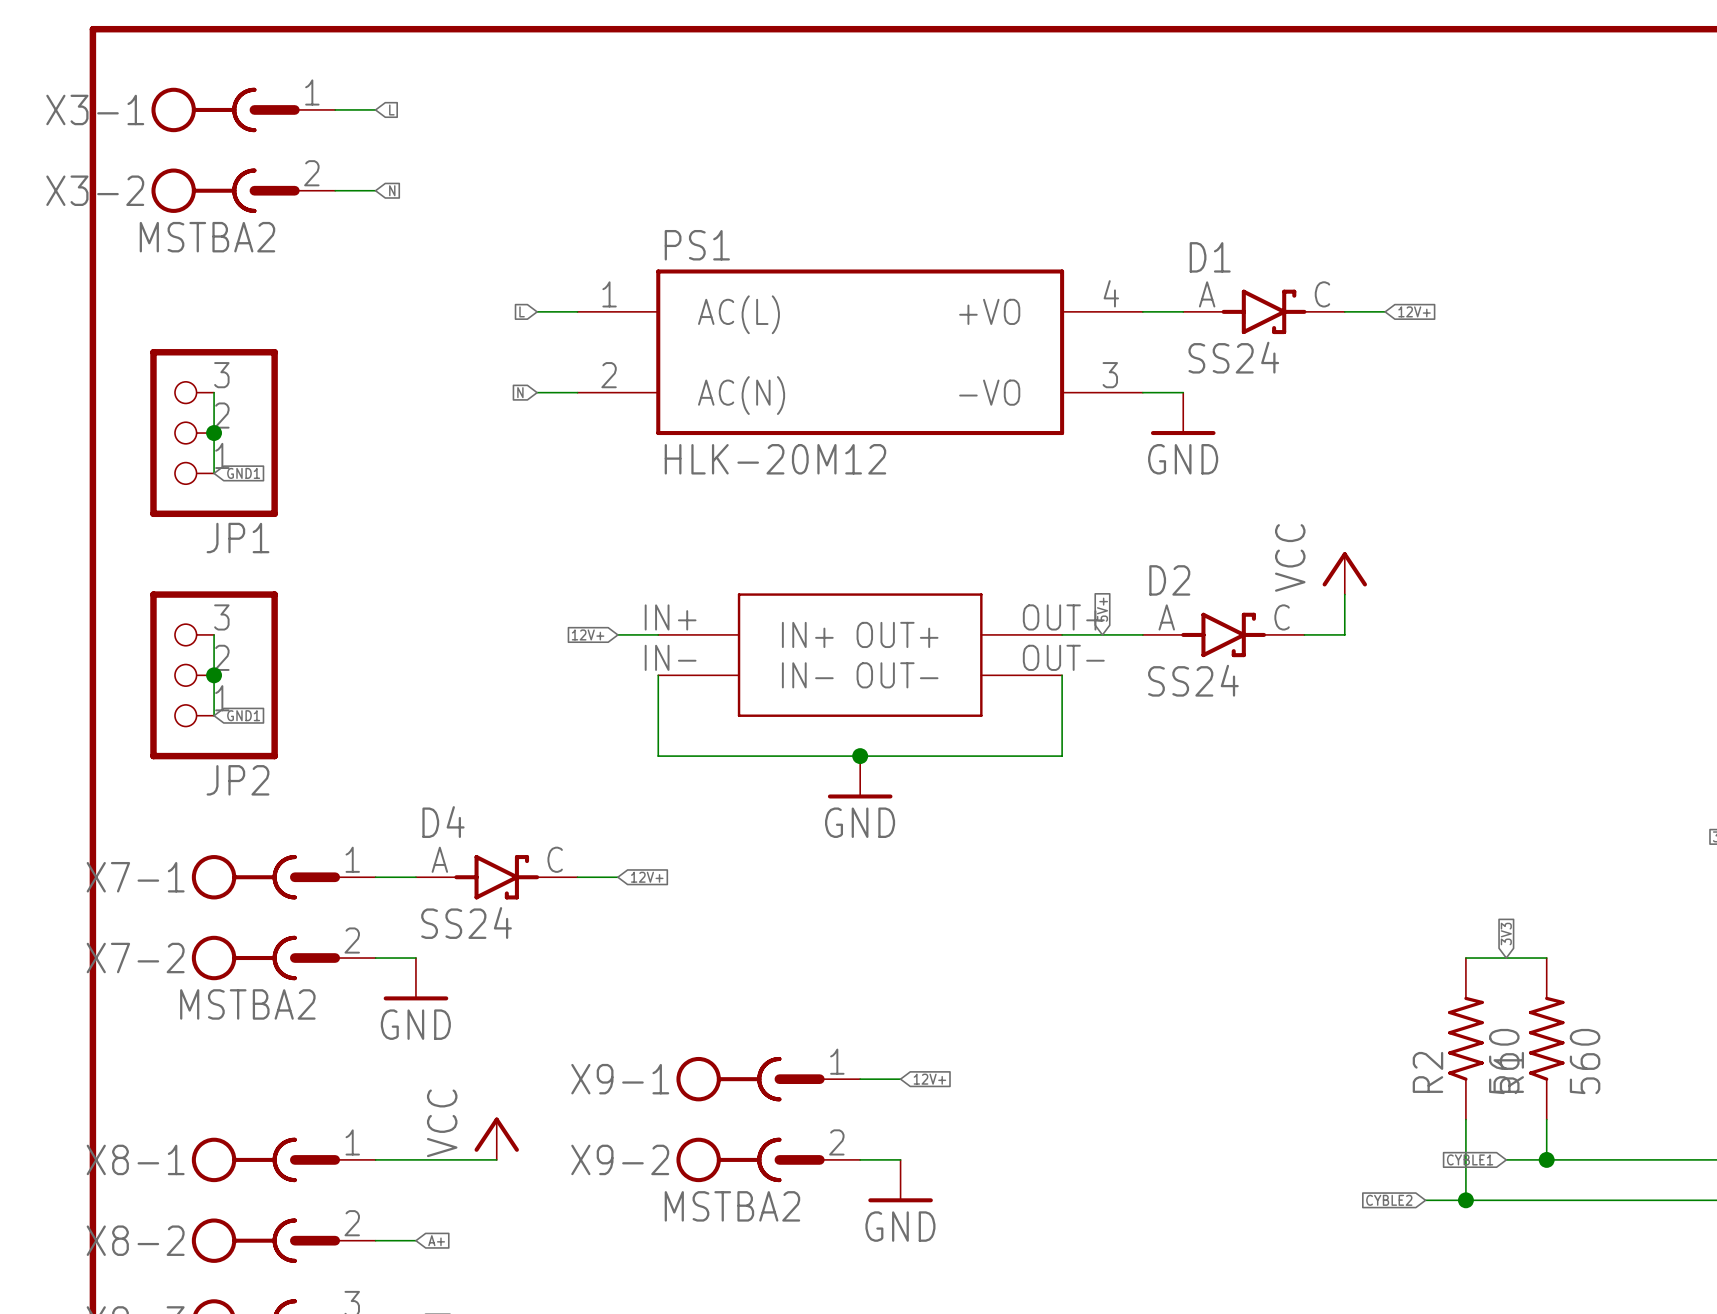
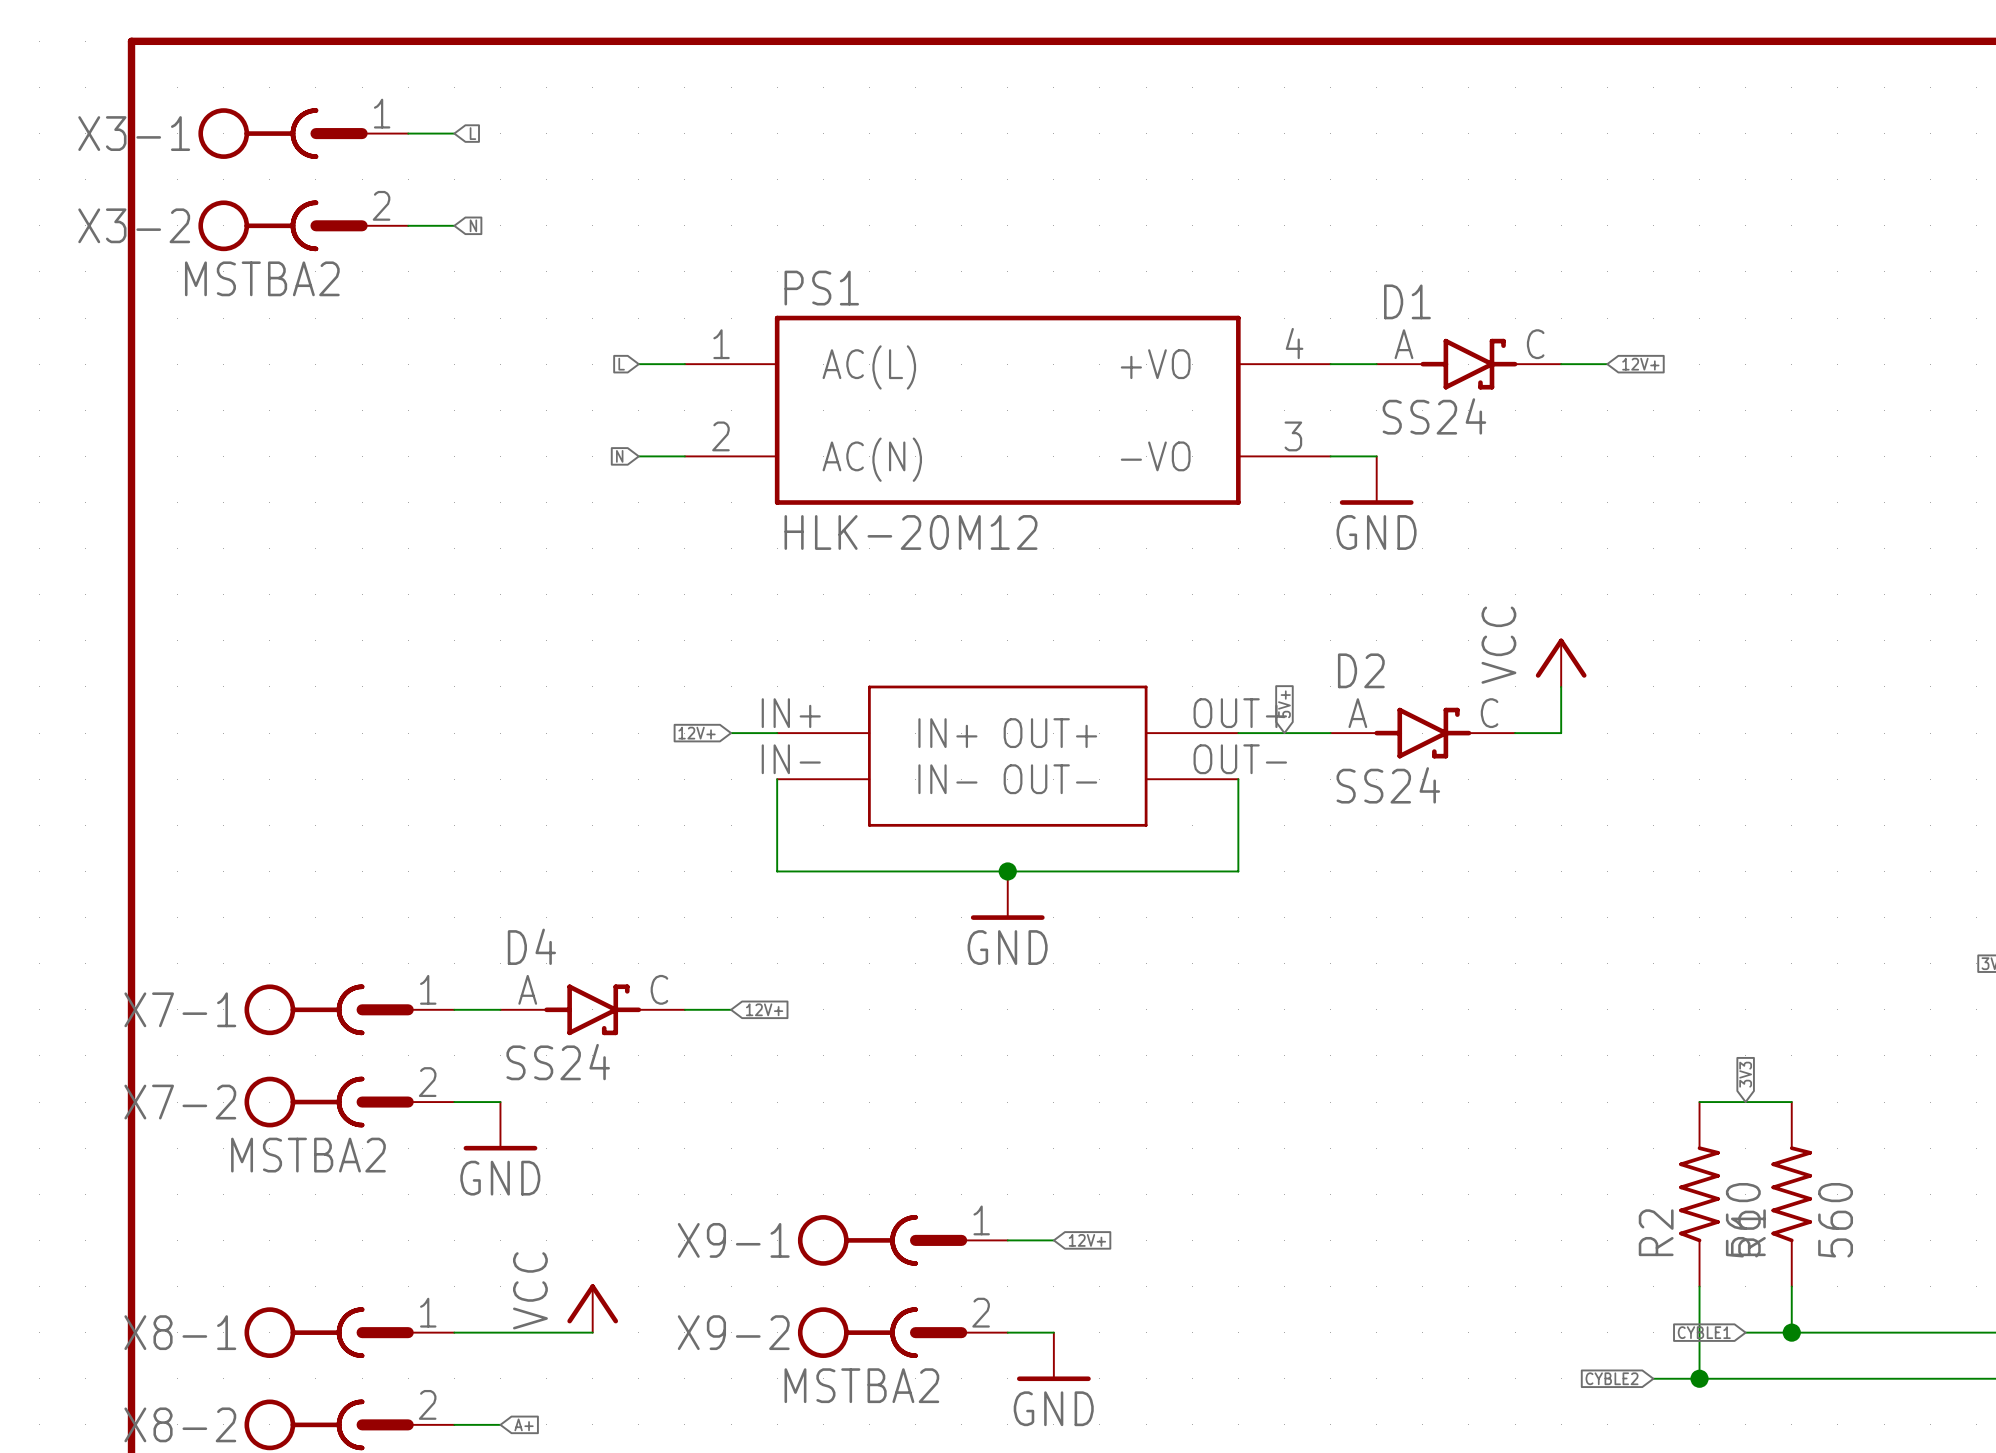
wire: (214, 392) (214, 473) -> none
JP1: (214, 433) -> none
junction: (214, 433) -> none
global label: GND1 (243, 473) -> none
wire: (214, 634) (214, 715) -> none
JP2: (214, 675) -> none
junction: (214, 675) -> none
global label: GND1 (243, 715) -> none

